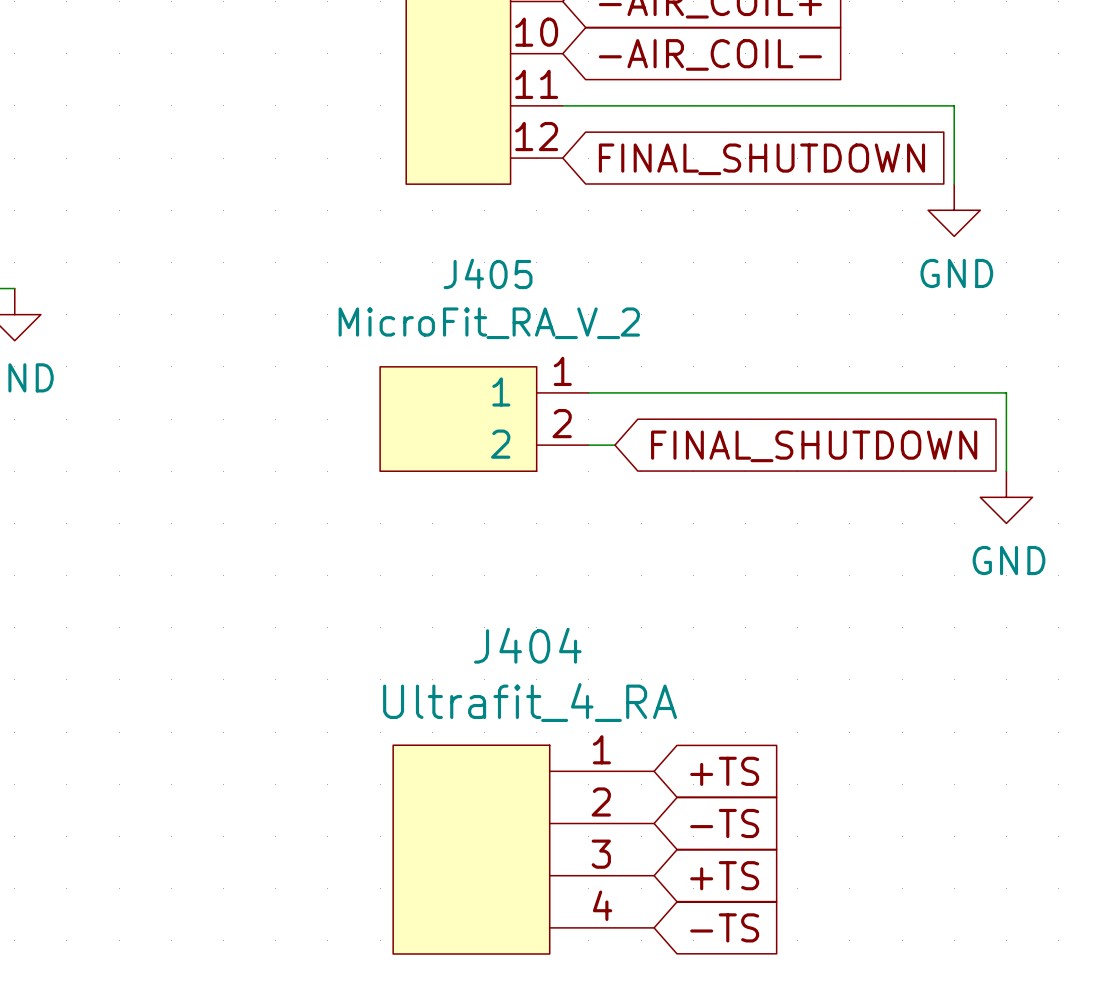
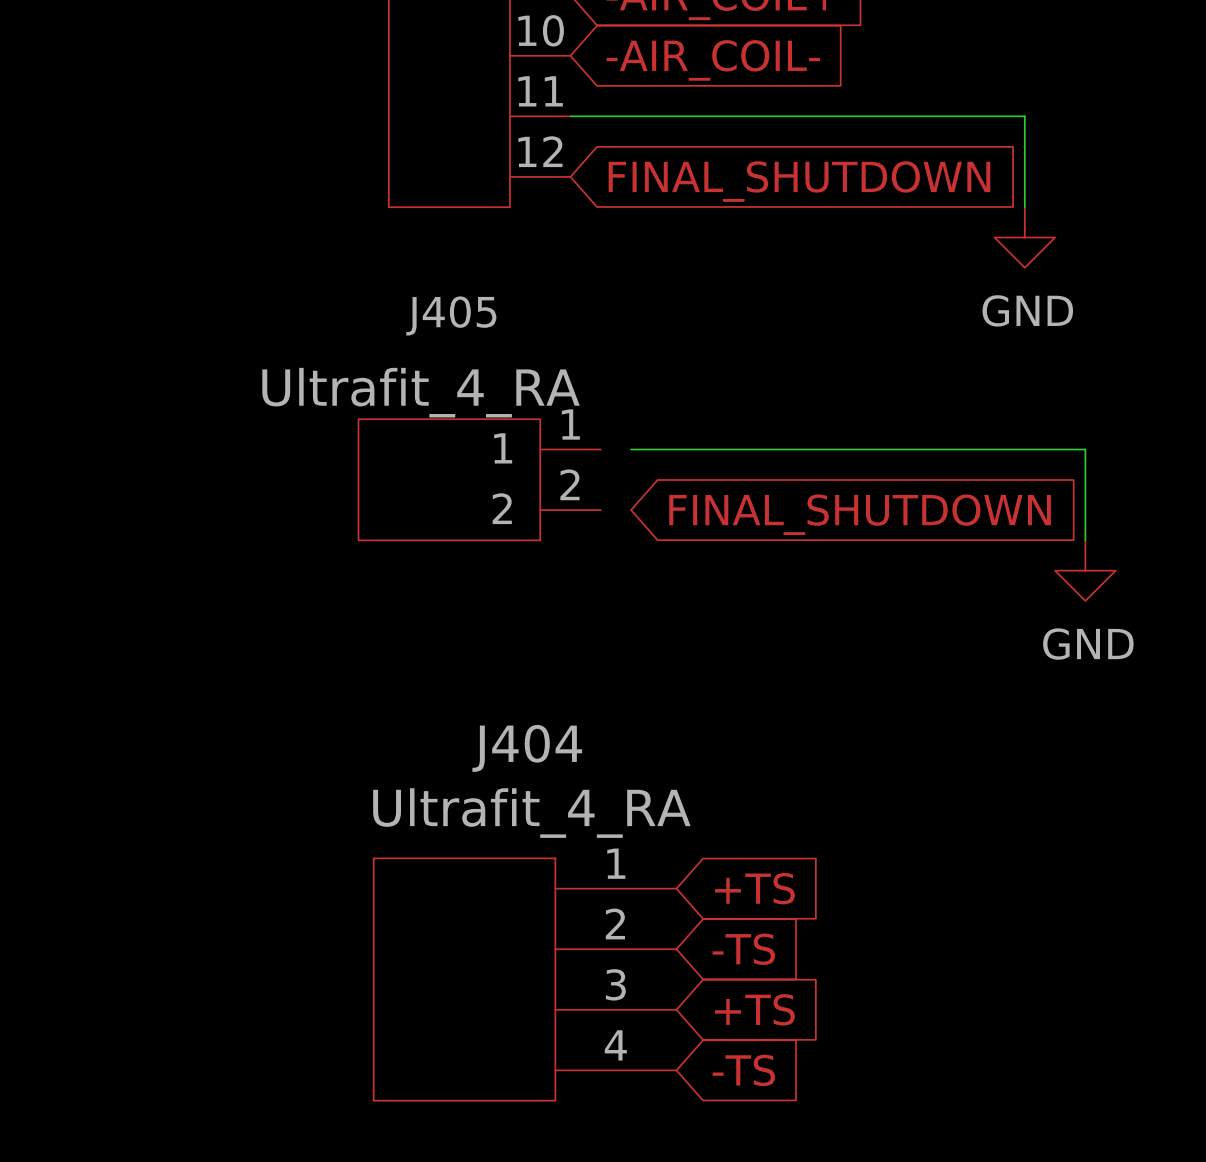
J405 name position: J405 (488, 273) -> J405 (451, 315)
J405 value: MicroFit_RA_V_2 (489, 323) -> Ultrafit_4_RA (421, 392)
wire: (588, 392) (614, 392) -> none
wire: (588, 445) (614, 445) -> none

